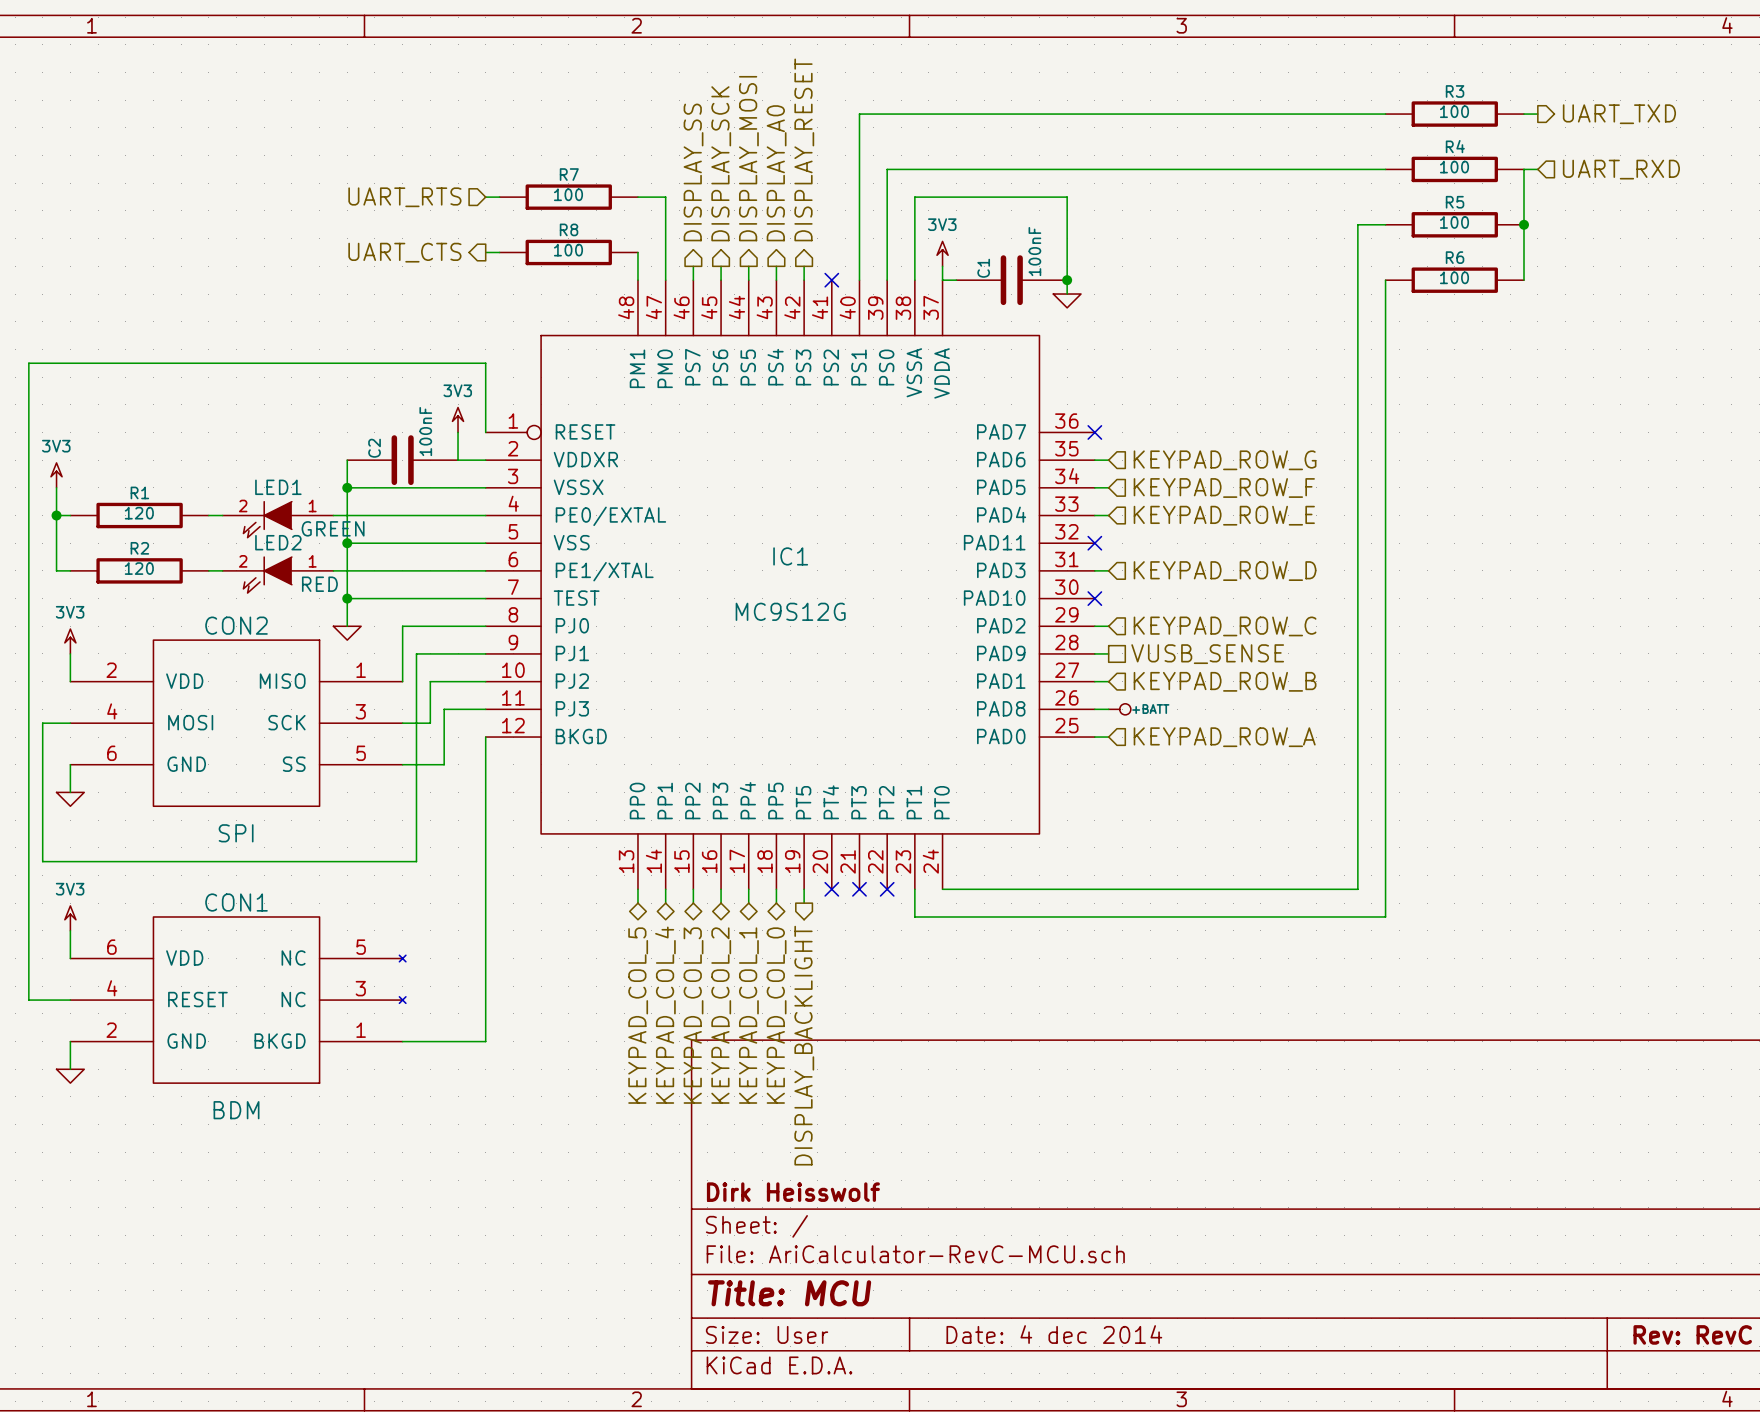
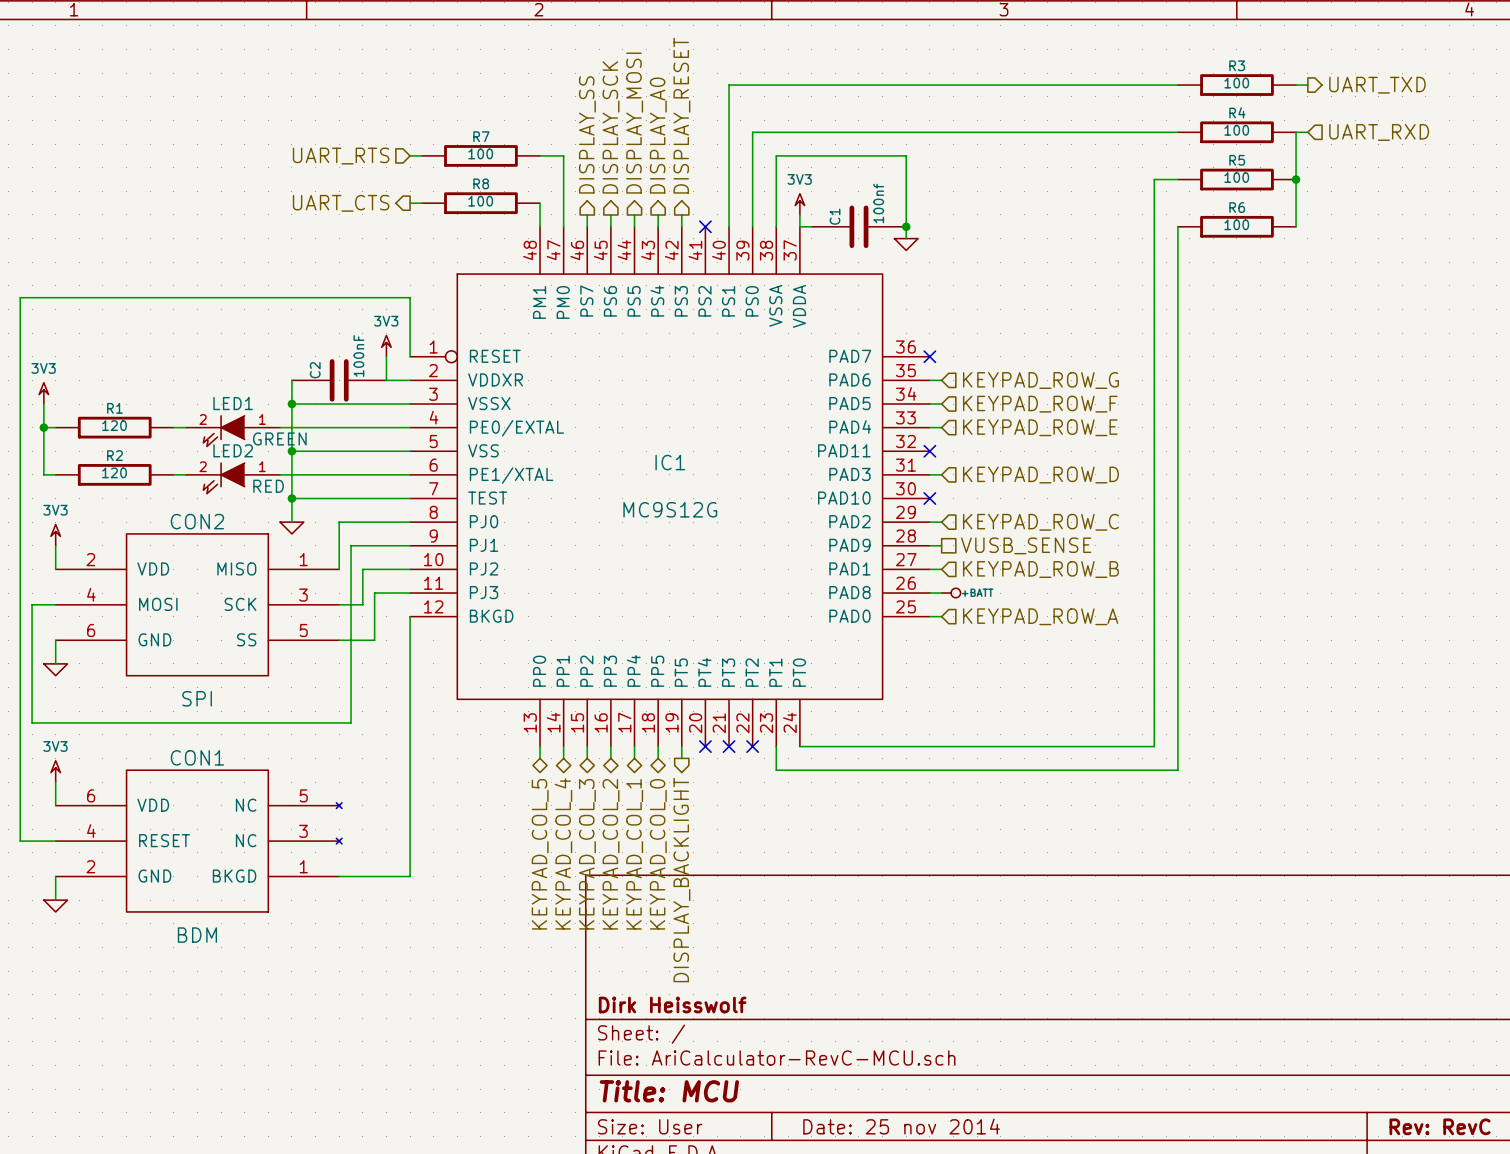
C1 value: 100nF (1034, 251) -> 100nf (878, 203)
title block: Date: 4 dec 2014 (1054, 1334) -> Date: 25 nov 2014 (901, 1126)

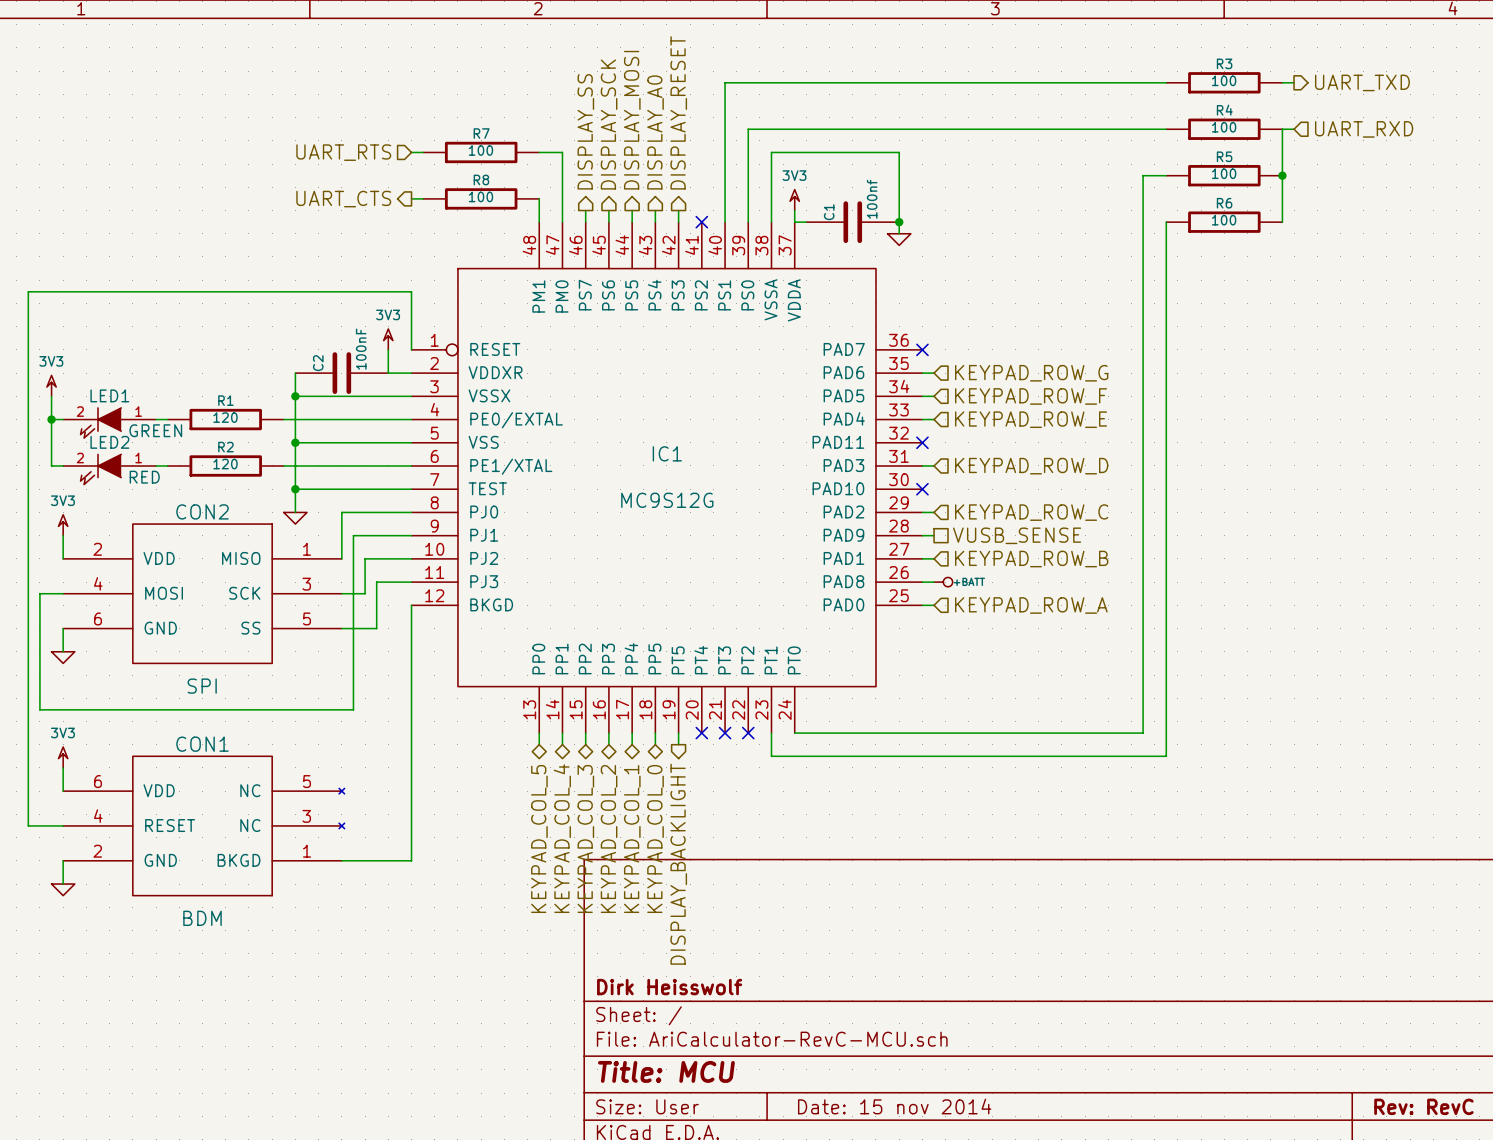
R1 position: (114, 427) -> (225, 419)
LED1 position: (232, 431) -> (109, 423)
R2 position: (114, 474) -> (225, 465)
LED2 position: (232, 478) -> (109, 469)
title block: Date: 25 nov 2014 (901, 1126) -> Date: 15 nov 2014 (894, 1106)

